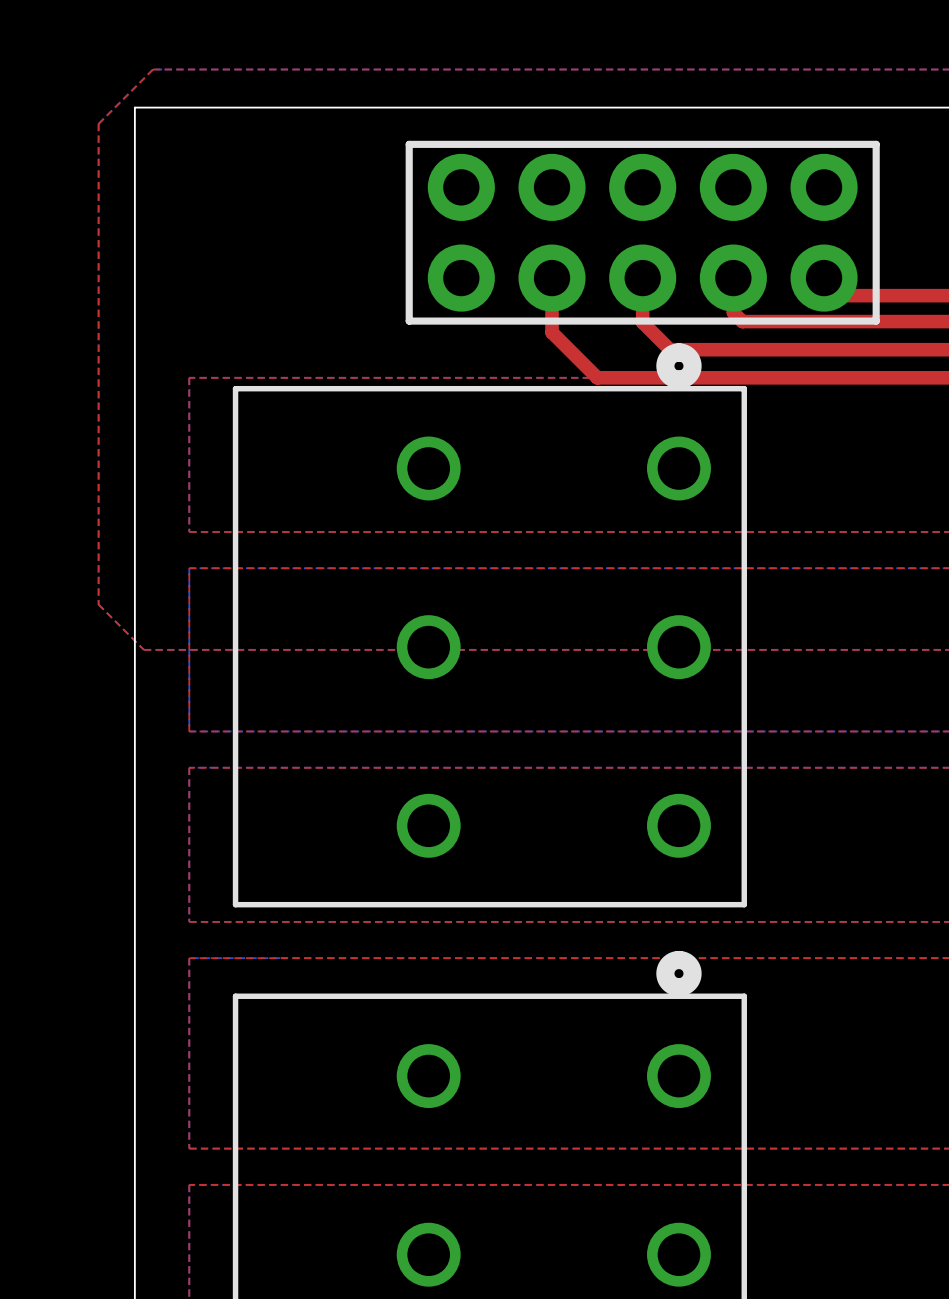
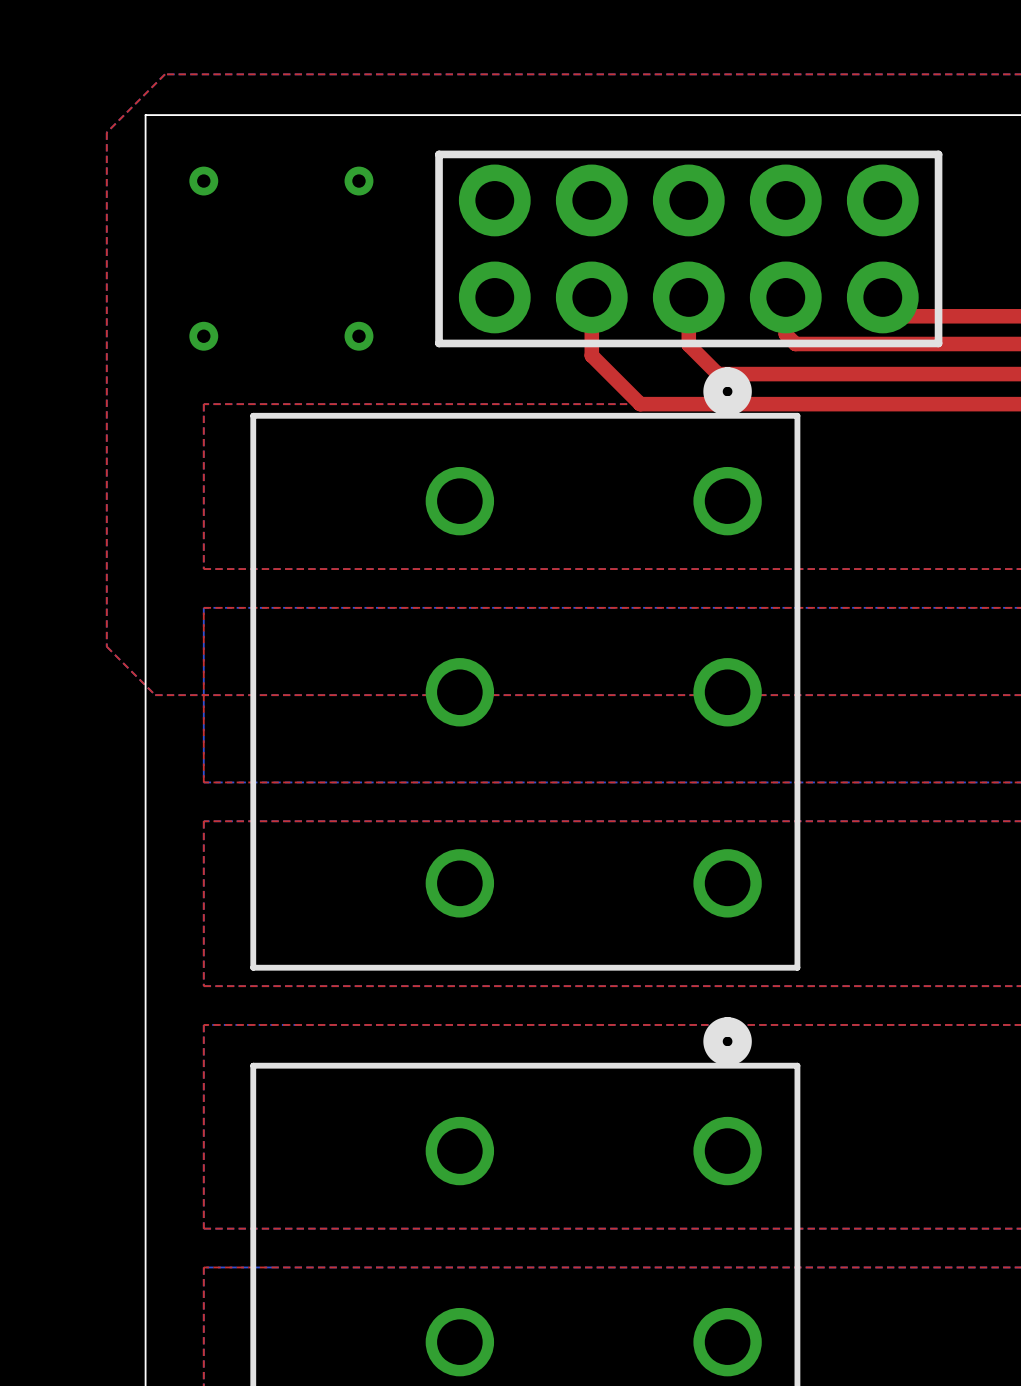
via: none -> (203, 181)
via: none -> (358, 181)
via: none -> (203, 336)
via: none -> (358, 336)

